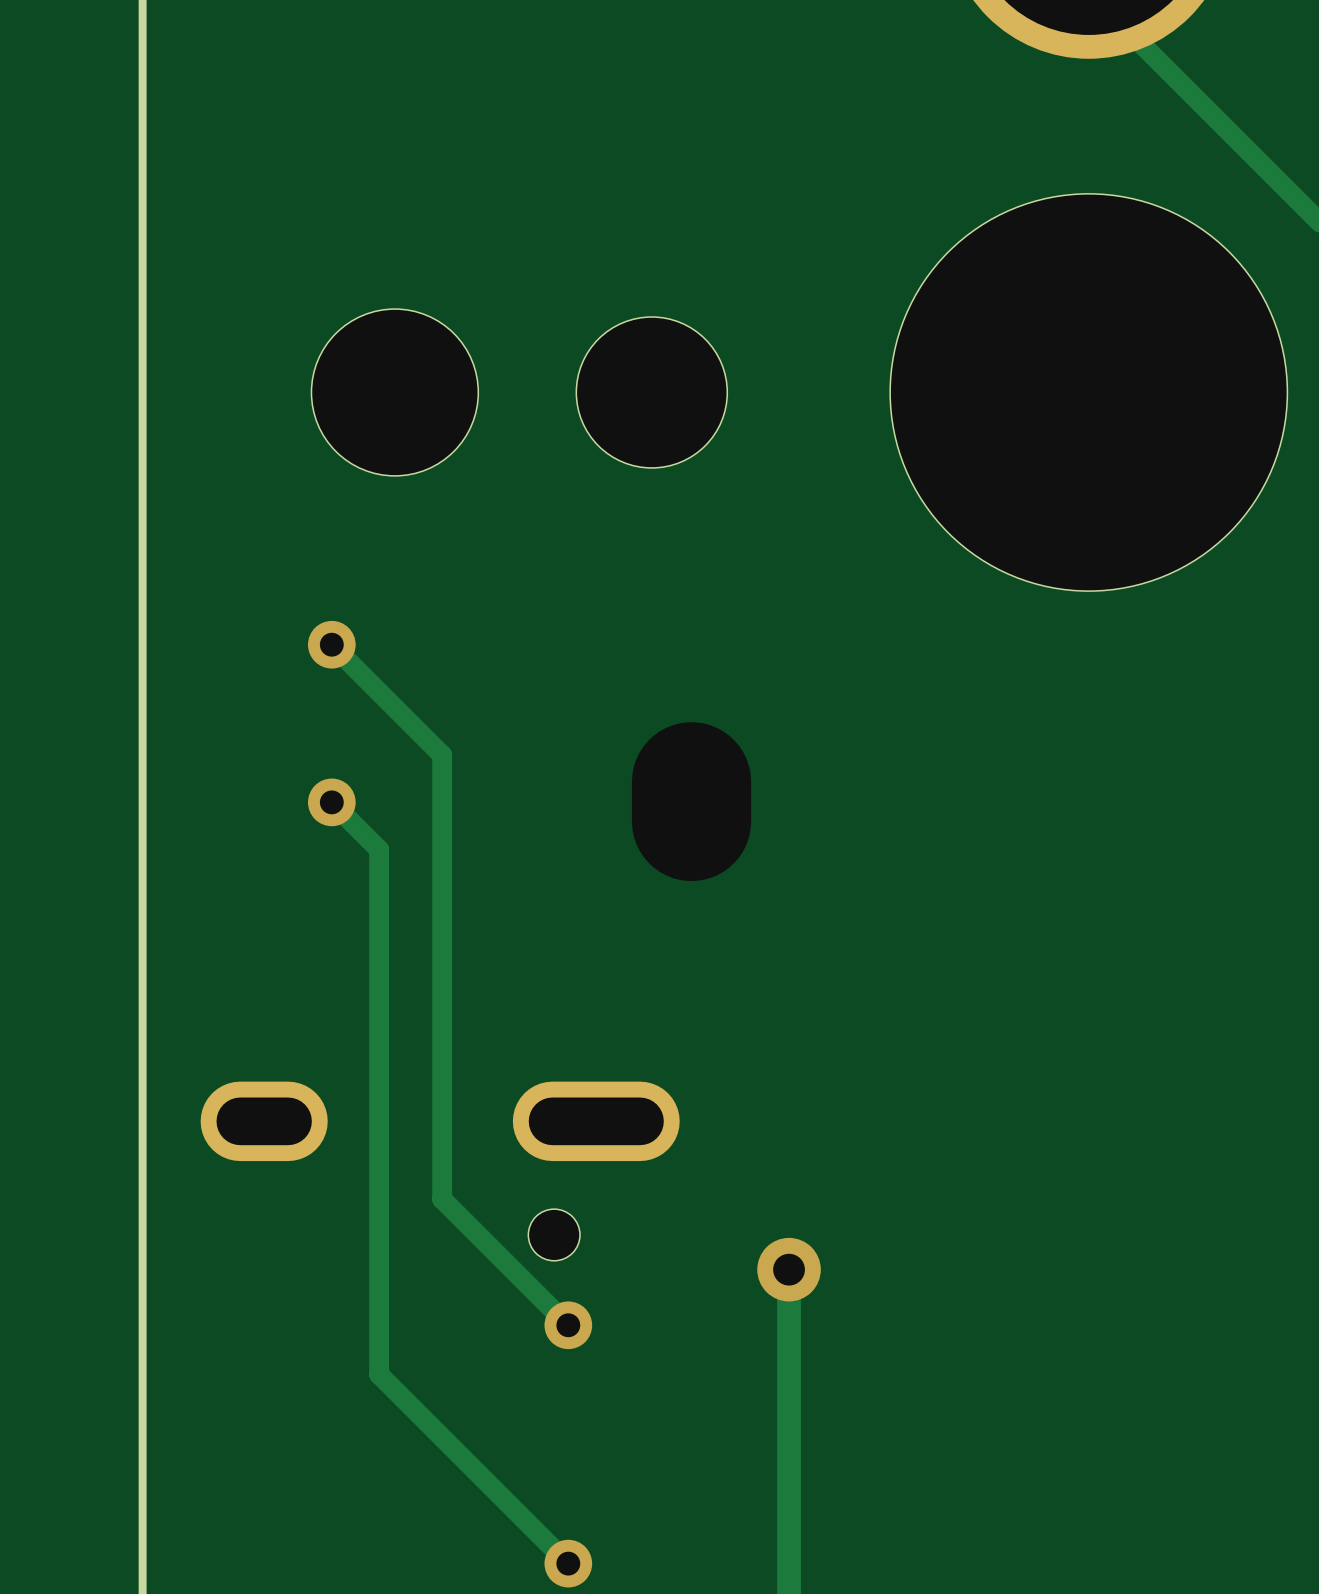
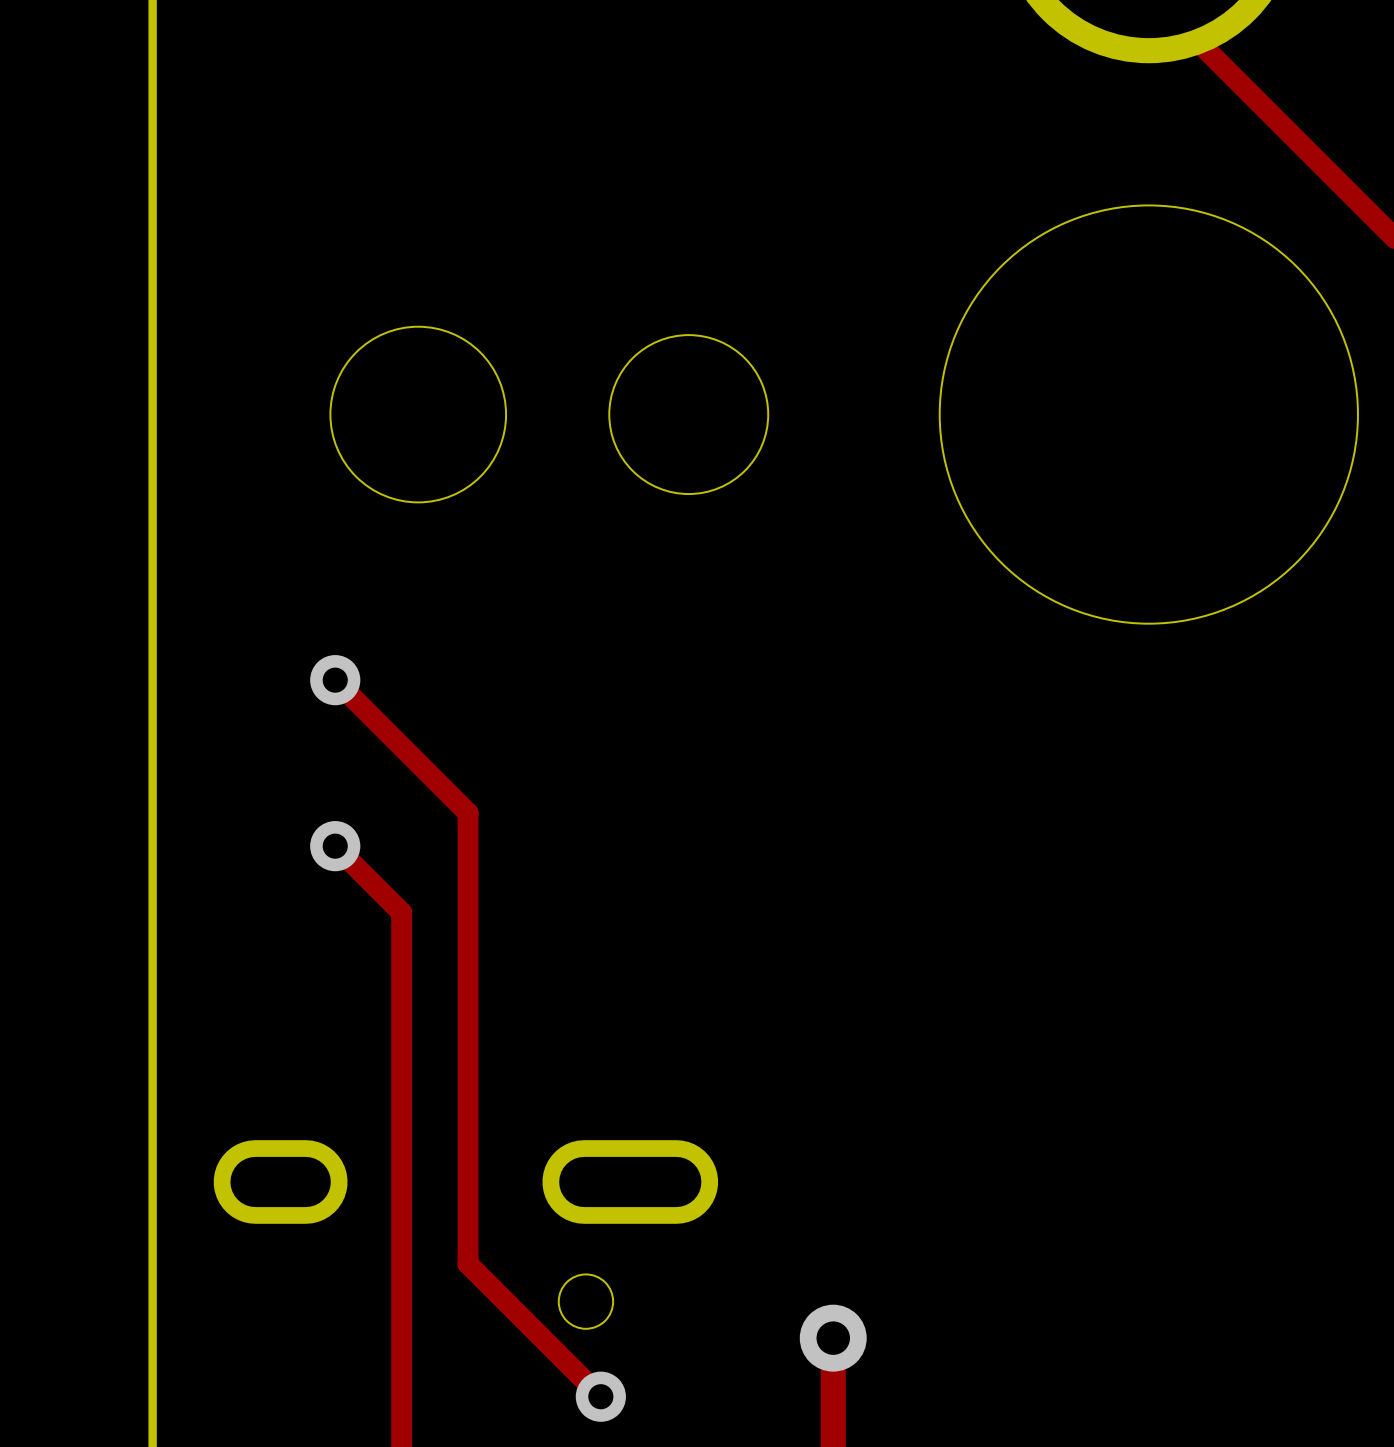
track: (331, 644) (442, 755) (442, 770) -> (335, 680) (468, 812)
via position: (331, 644) -> (335, 680)
track: (331, 802) (379, 849) (379, 865) -> (335, 846) (401, 912)
via position: (331, 802) -> (335, 846)

